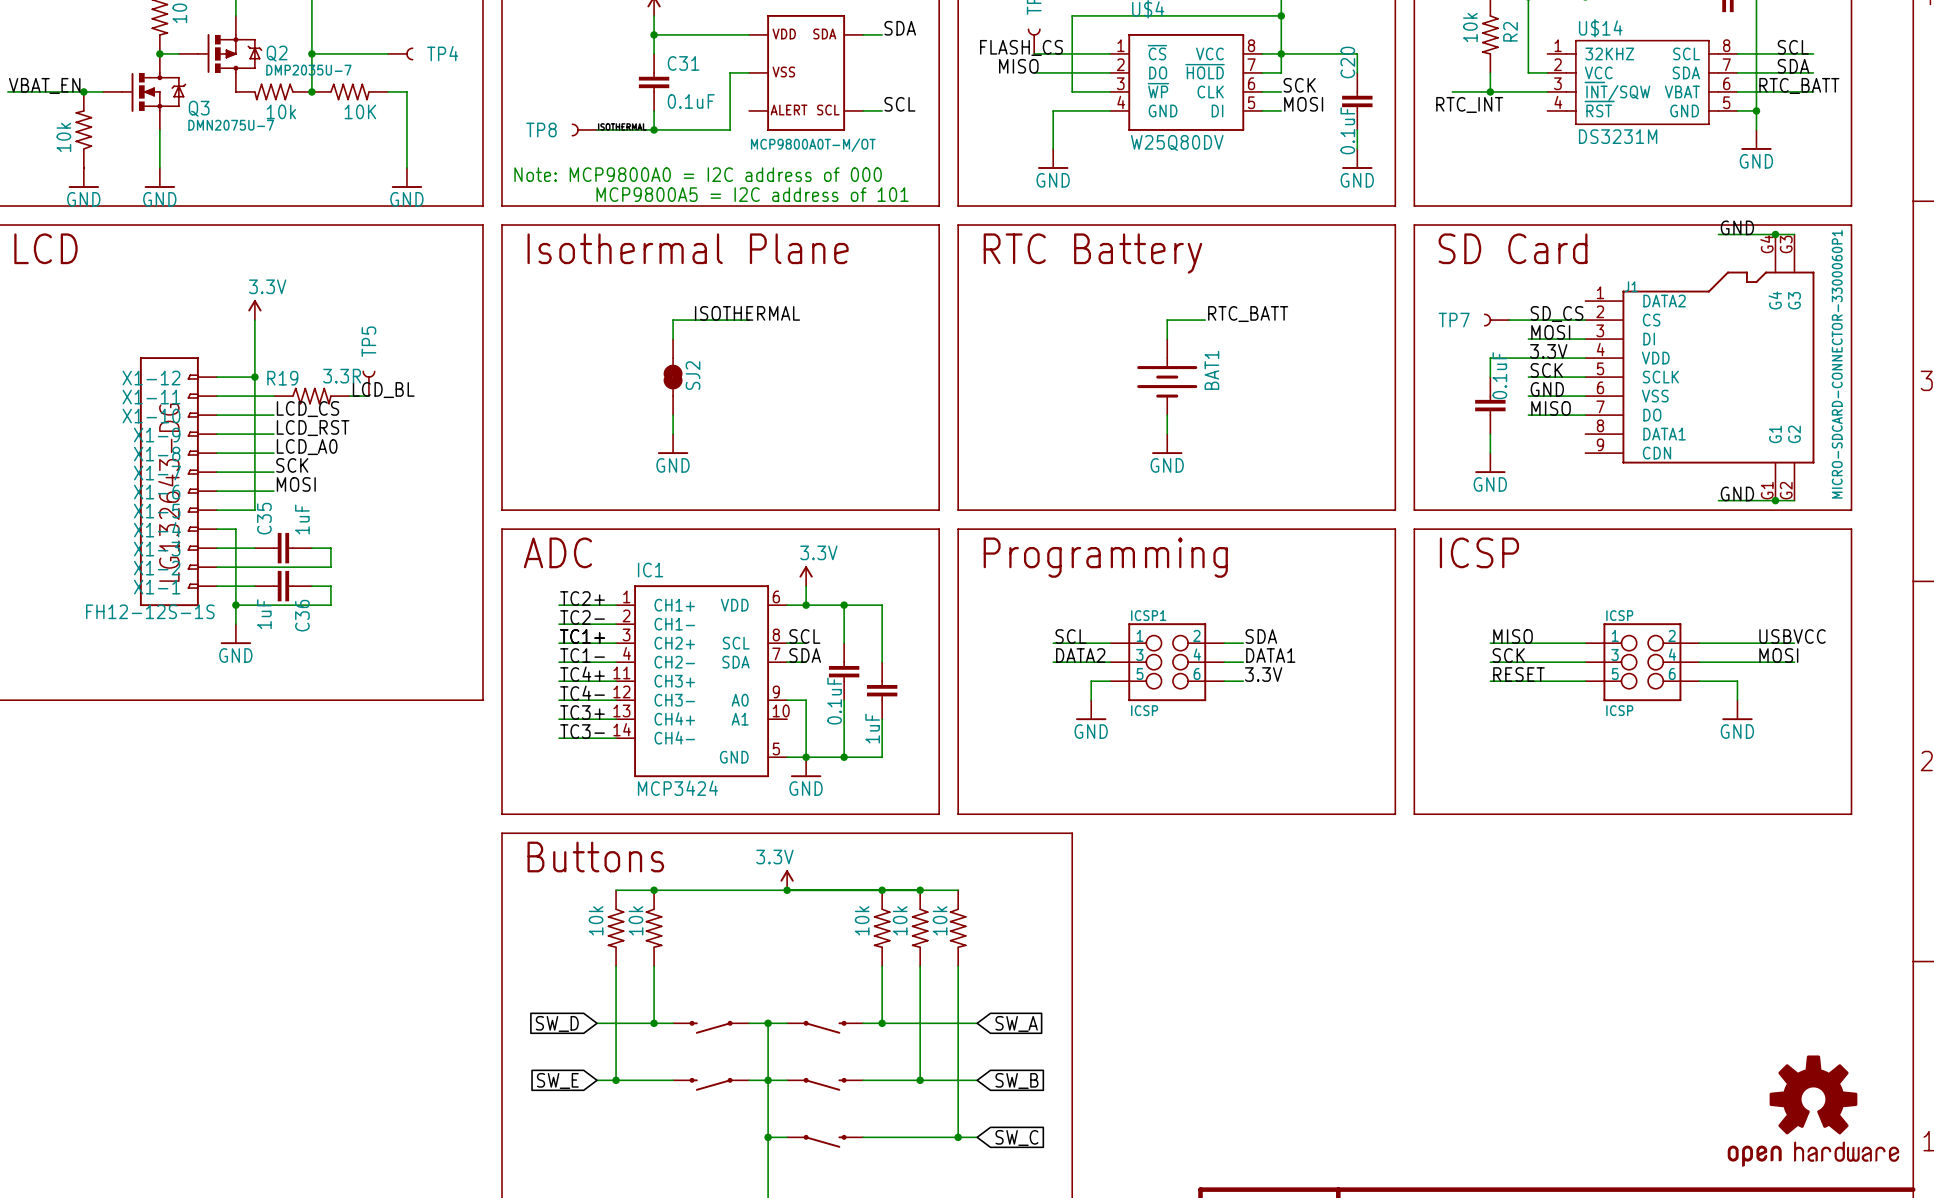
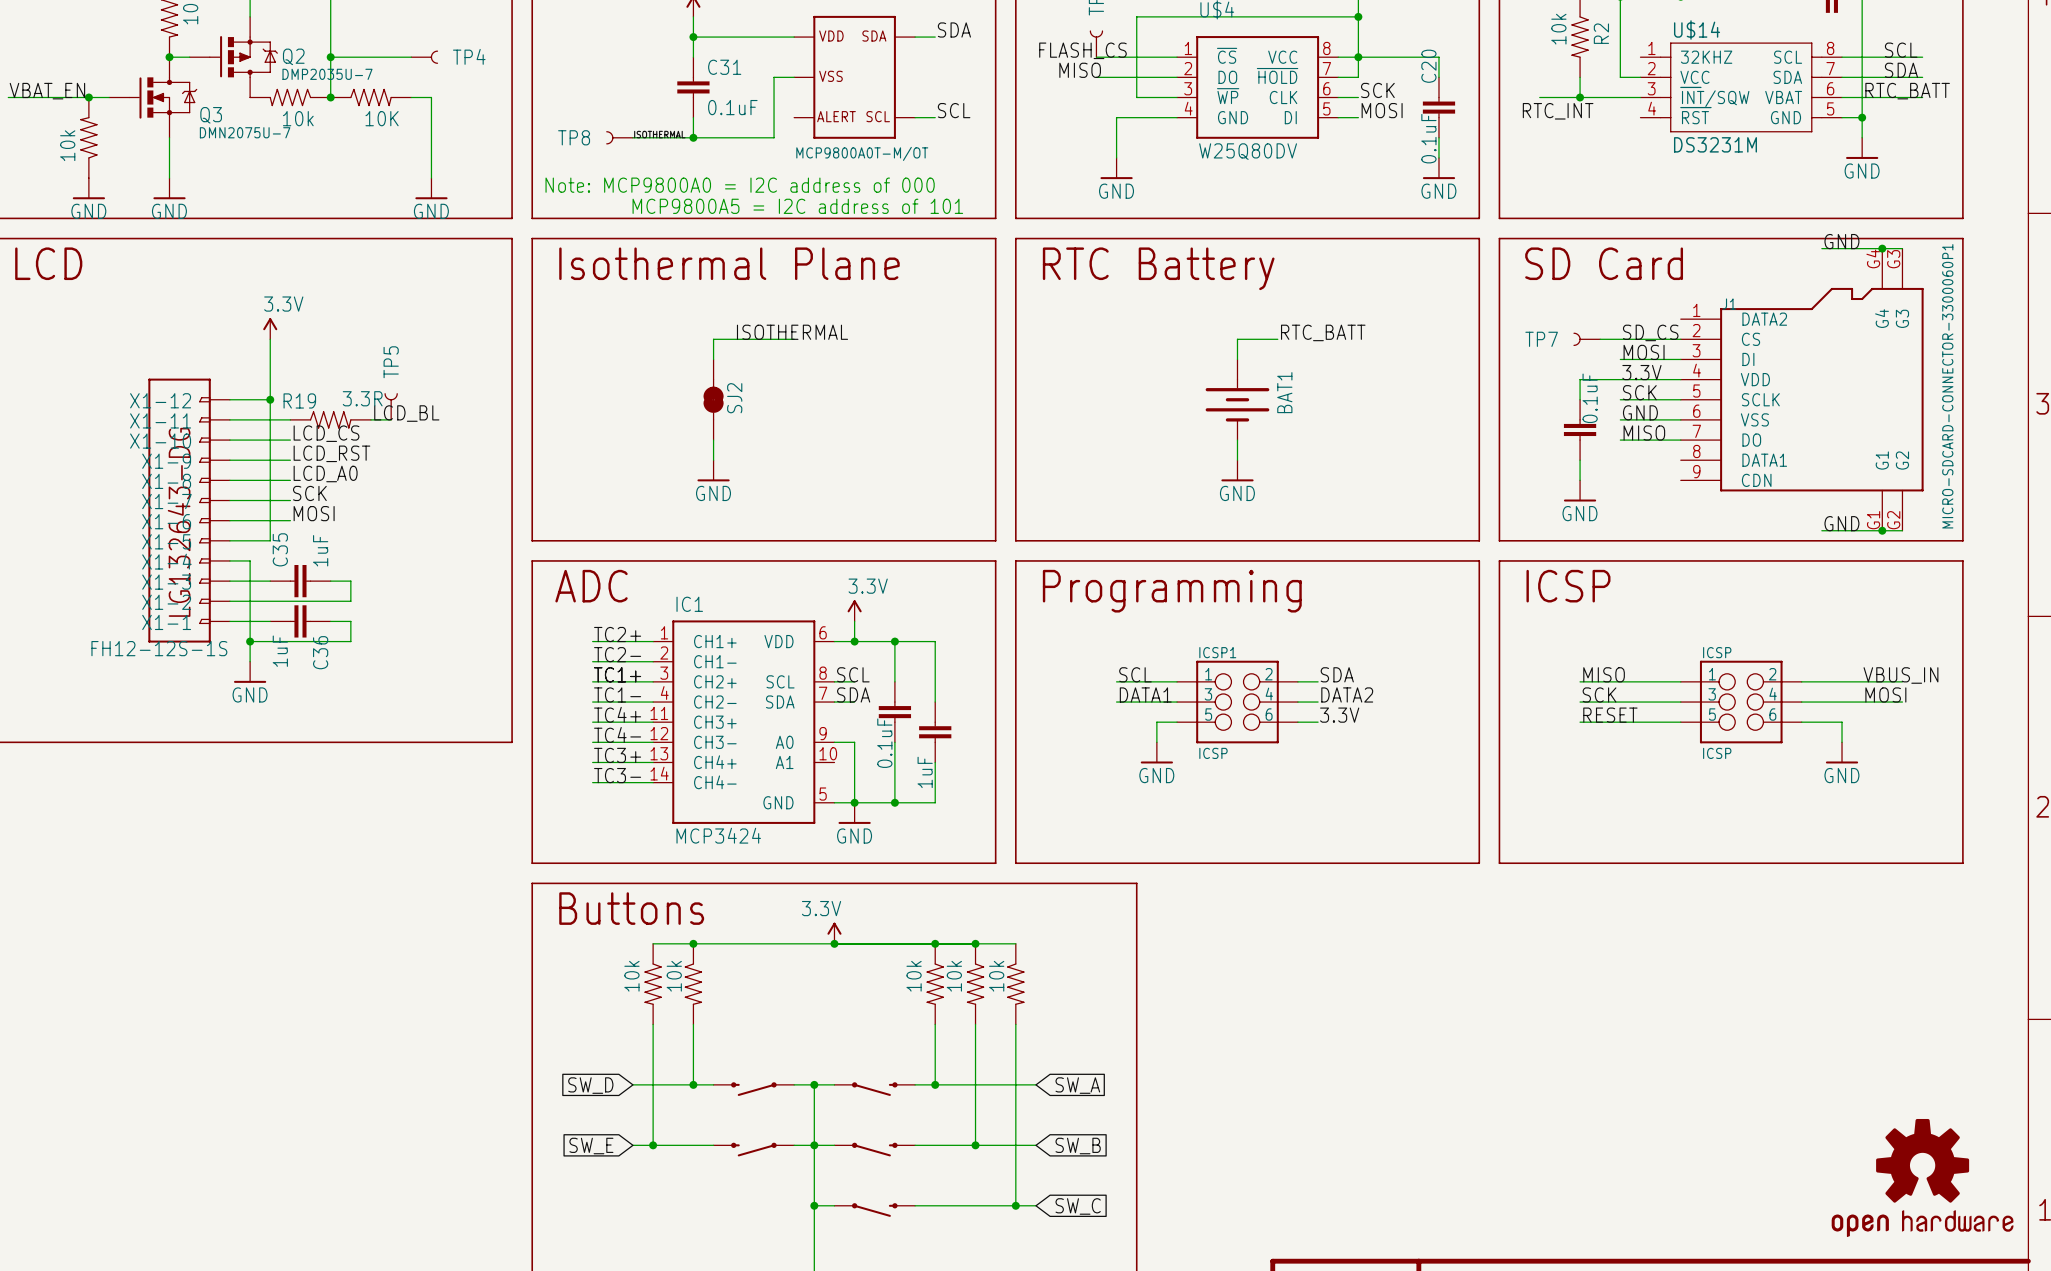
label: USBVCC (1792, 636) -> VBUS_IN (1900, 675)
label: DATA2 (1080, 655) -> DATA1 (1145, 694)
label: DATA1 (1270, 655) -> DATA2 (1347, 694)

